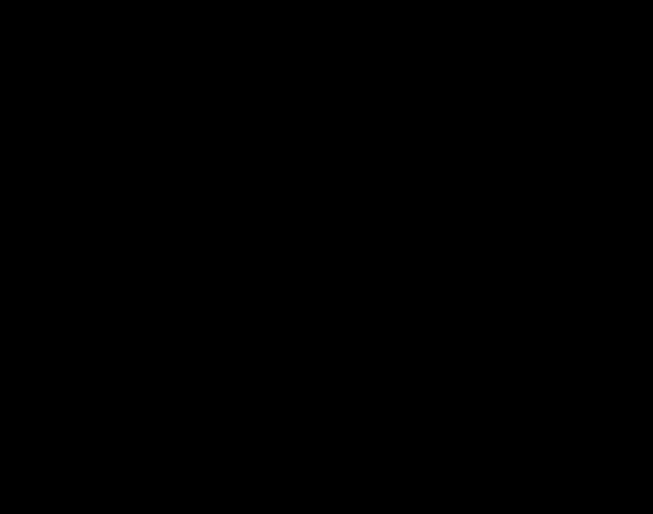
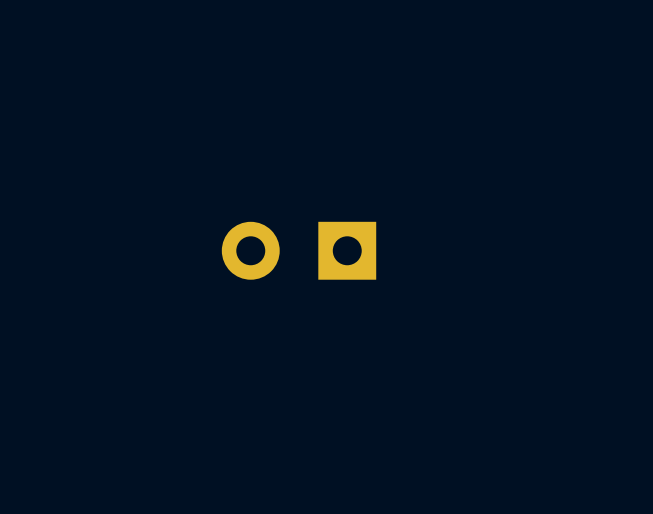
part: none -> (299, 250)

